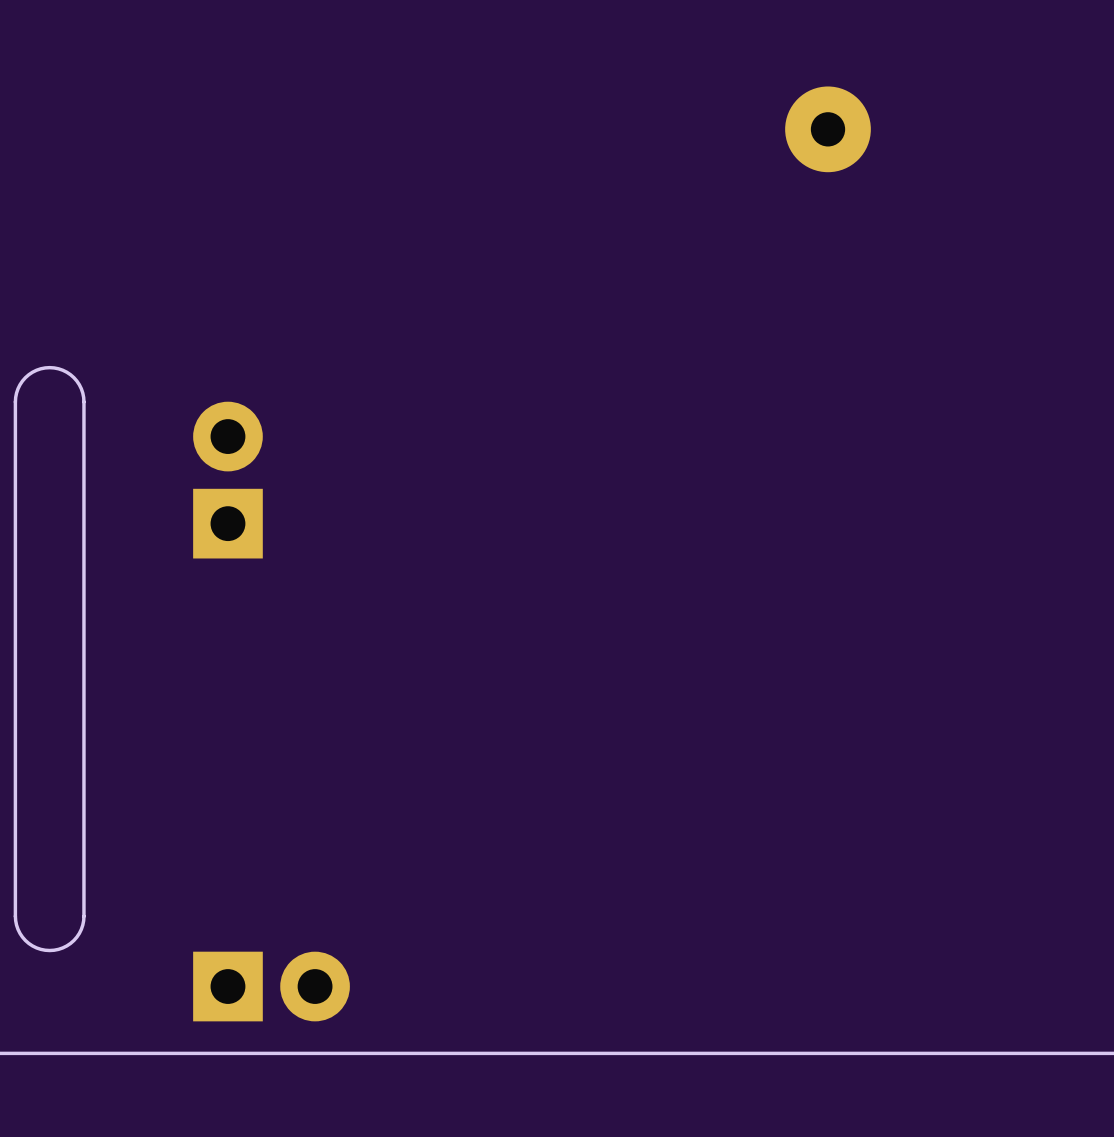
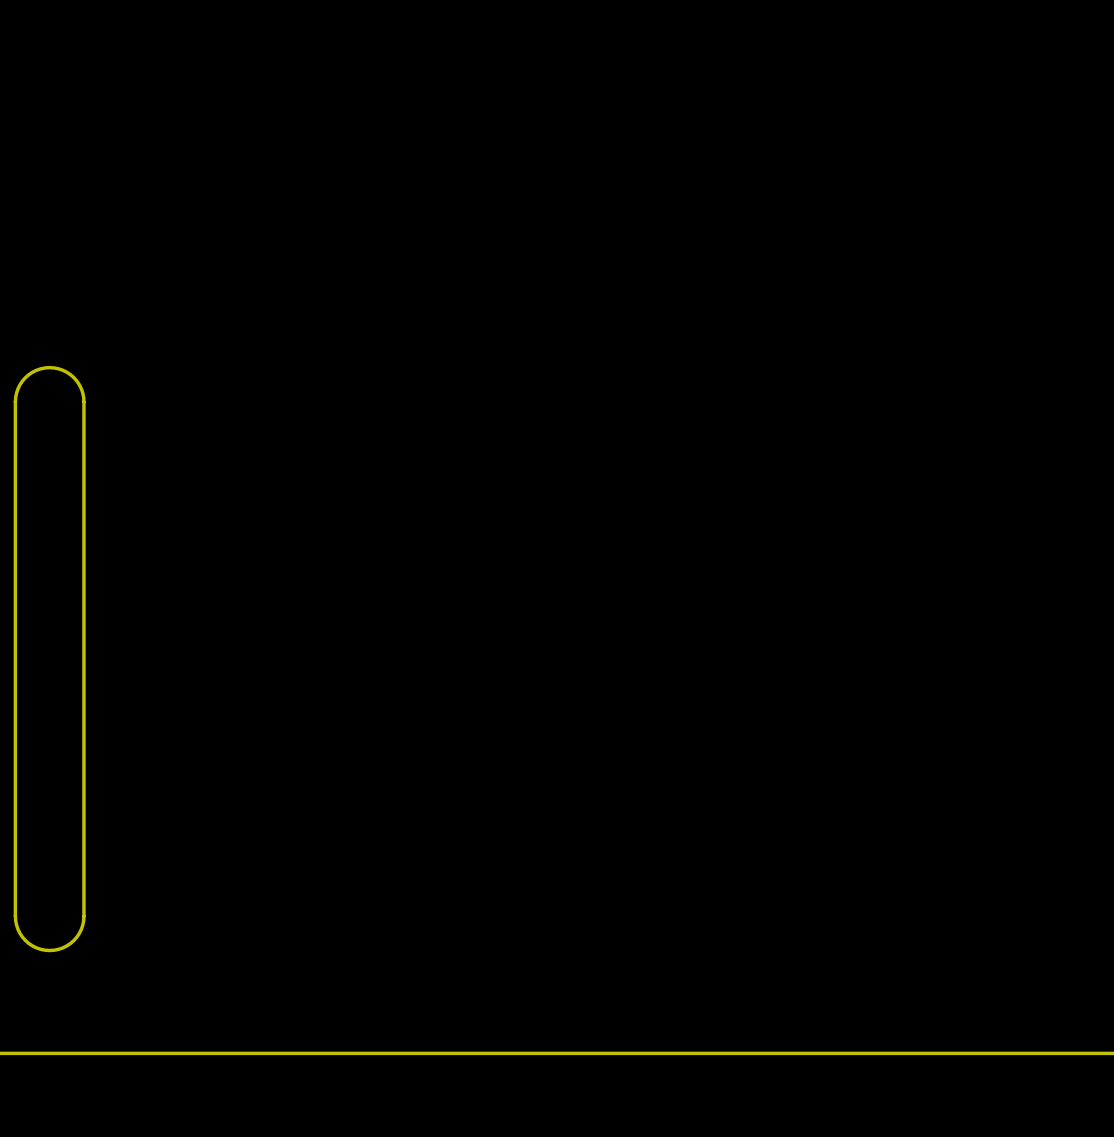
part: (828, 129) -> none
part: (227, 480) -> none
part: (271, 986) -> none

